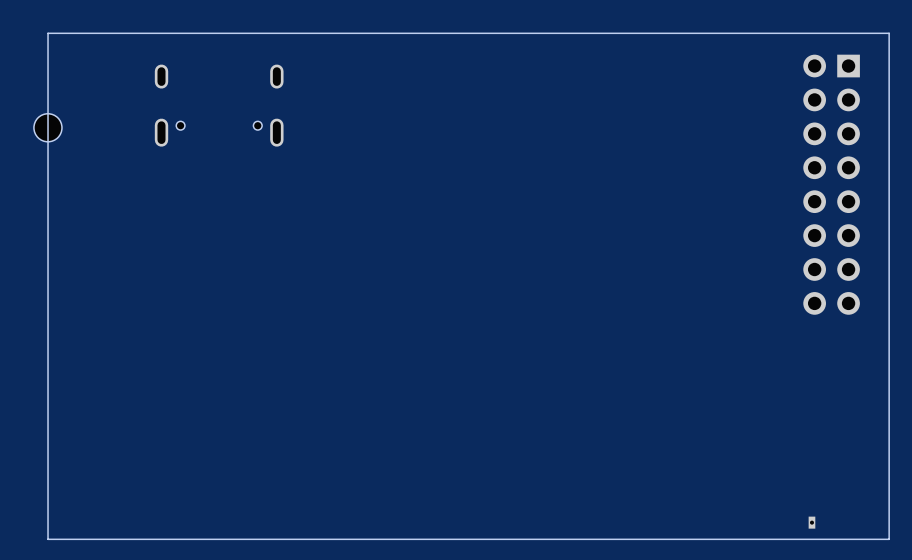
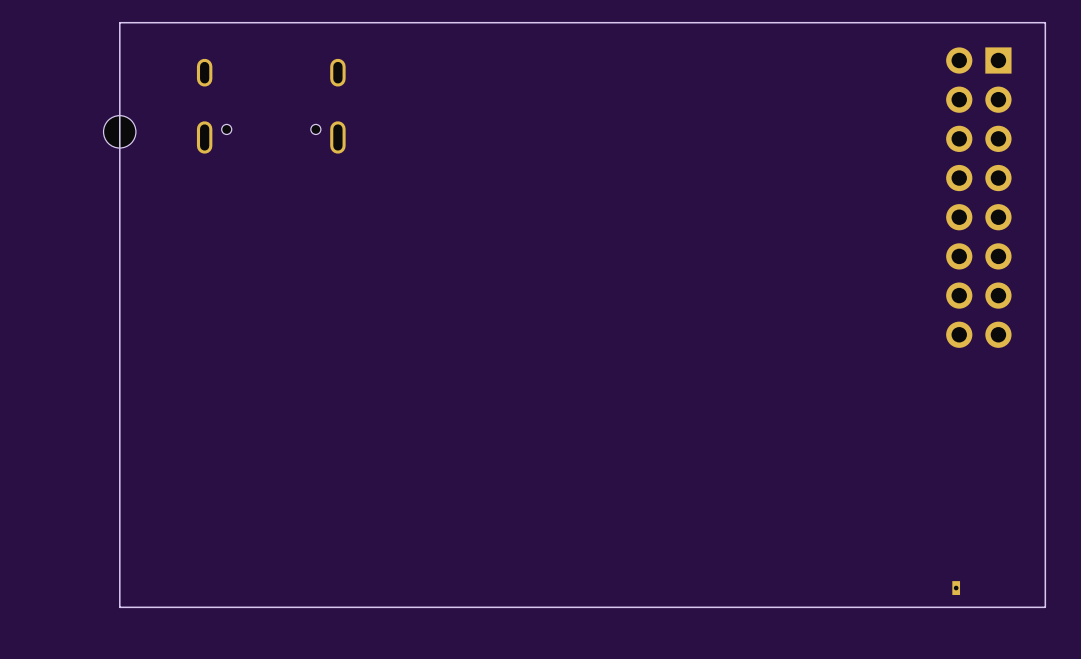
board edge: (88, 33) (48, 33) (48, 539) (88, 539) -> (119, 22) (119, 607)
part position: (47, 127) -> (119, 131)

